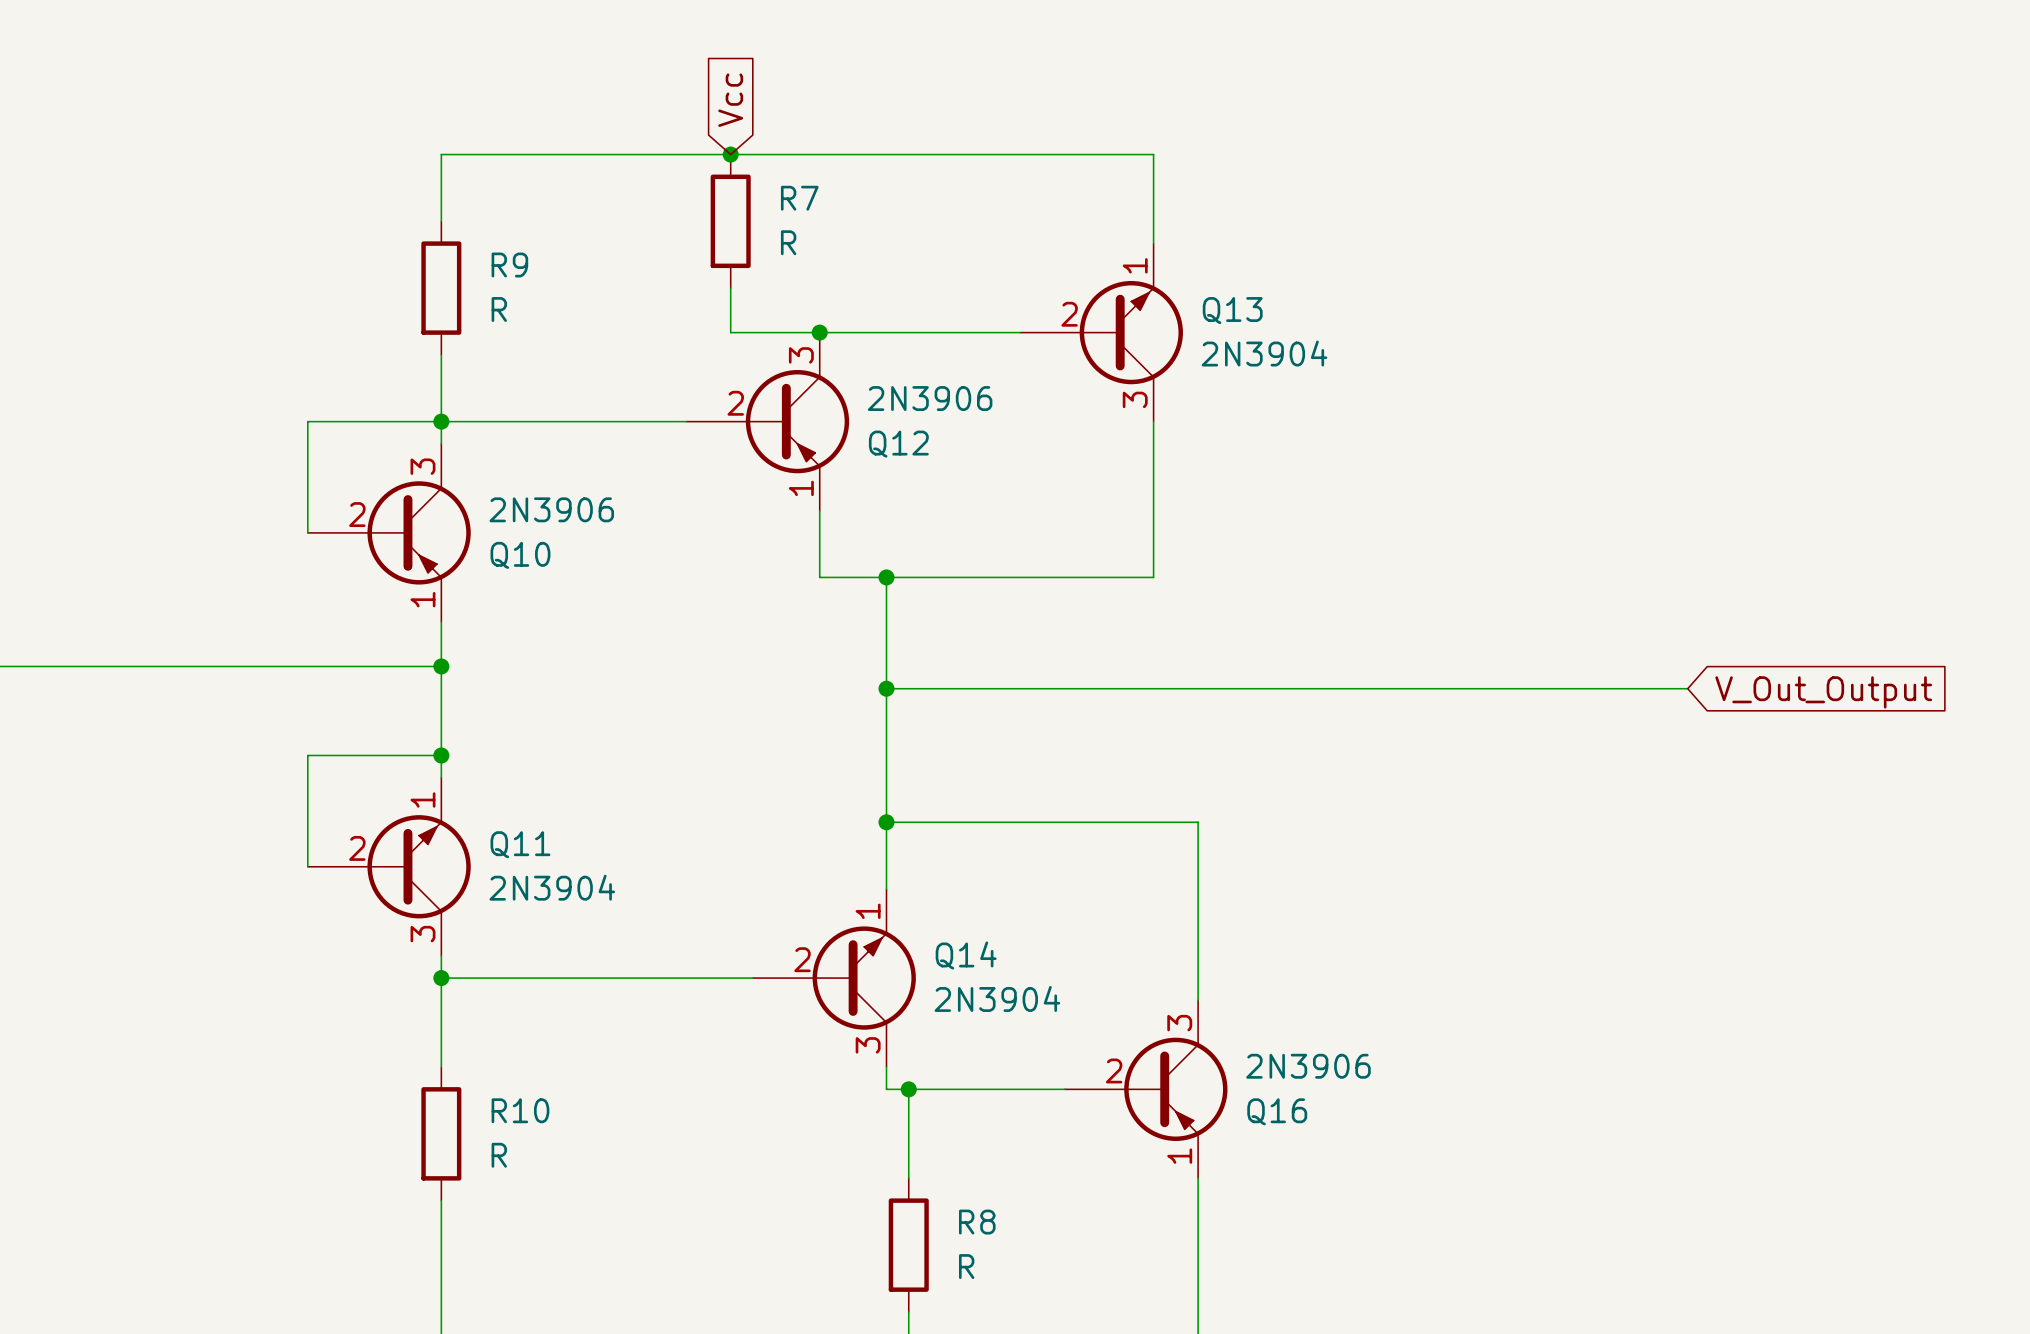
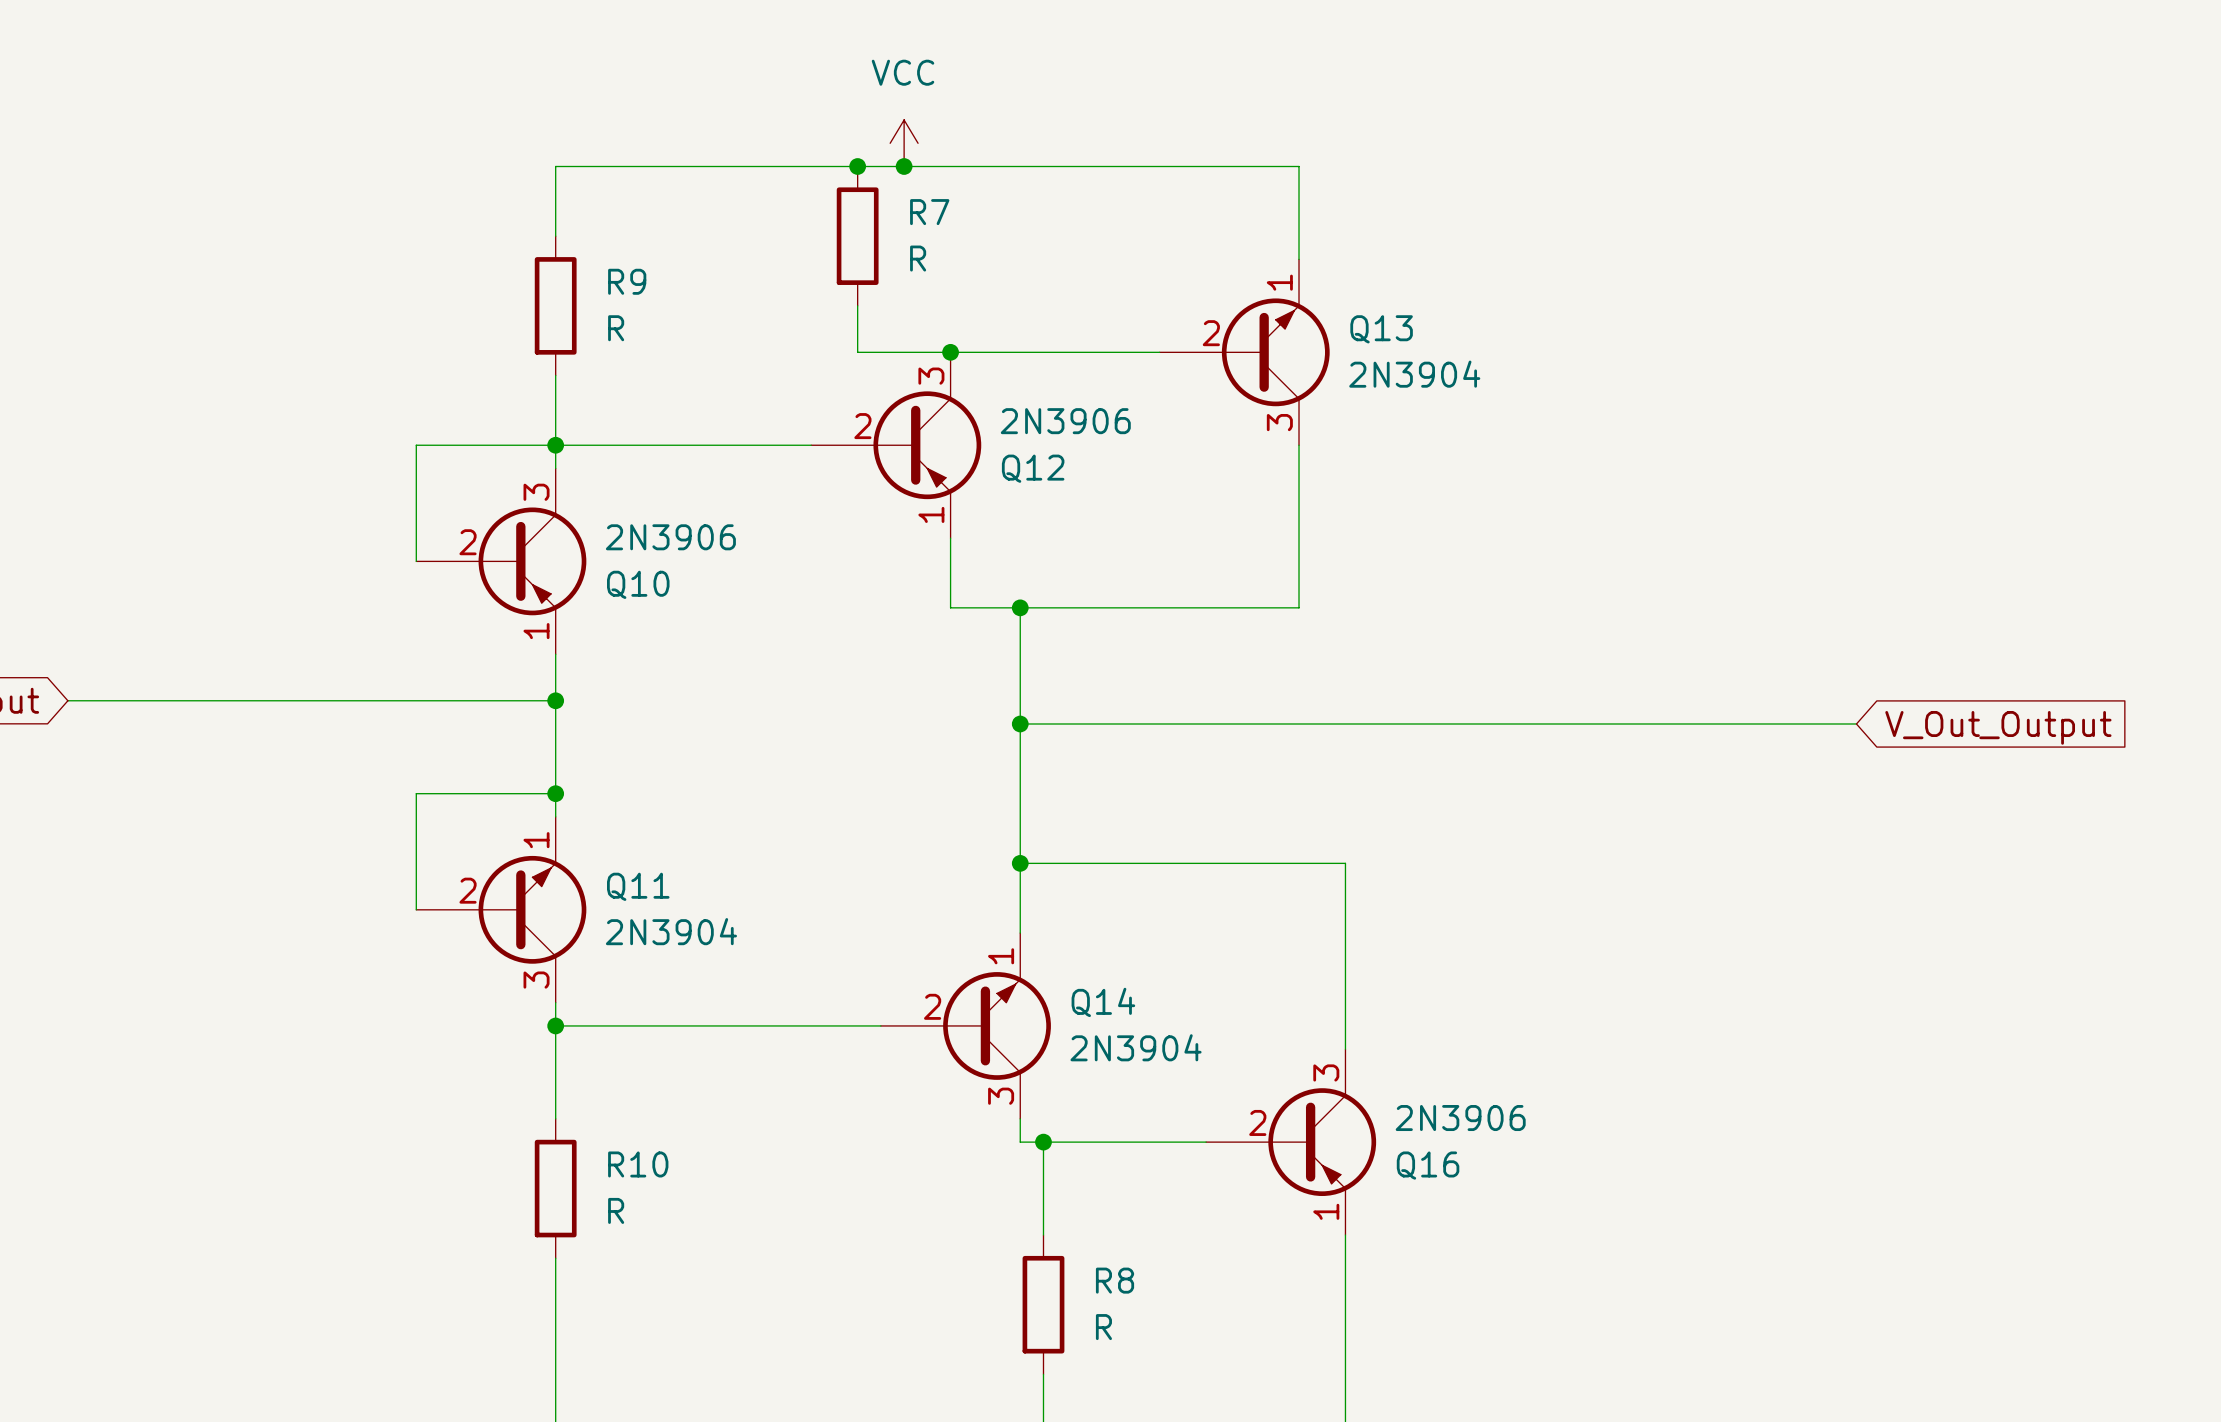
global label: Vcc (730, 100) -> none
power symbol: none -> VCC (904, 143)
junction: none -> (904, 166)

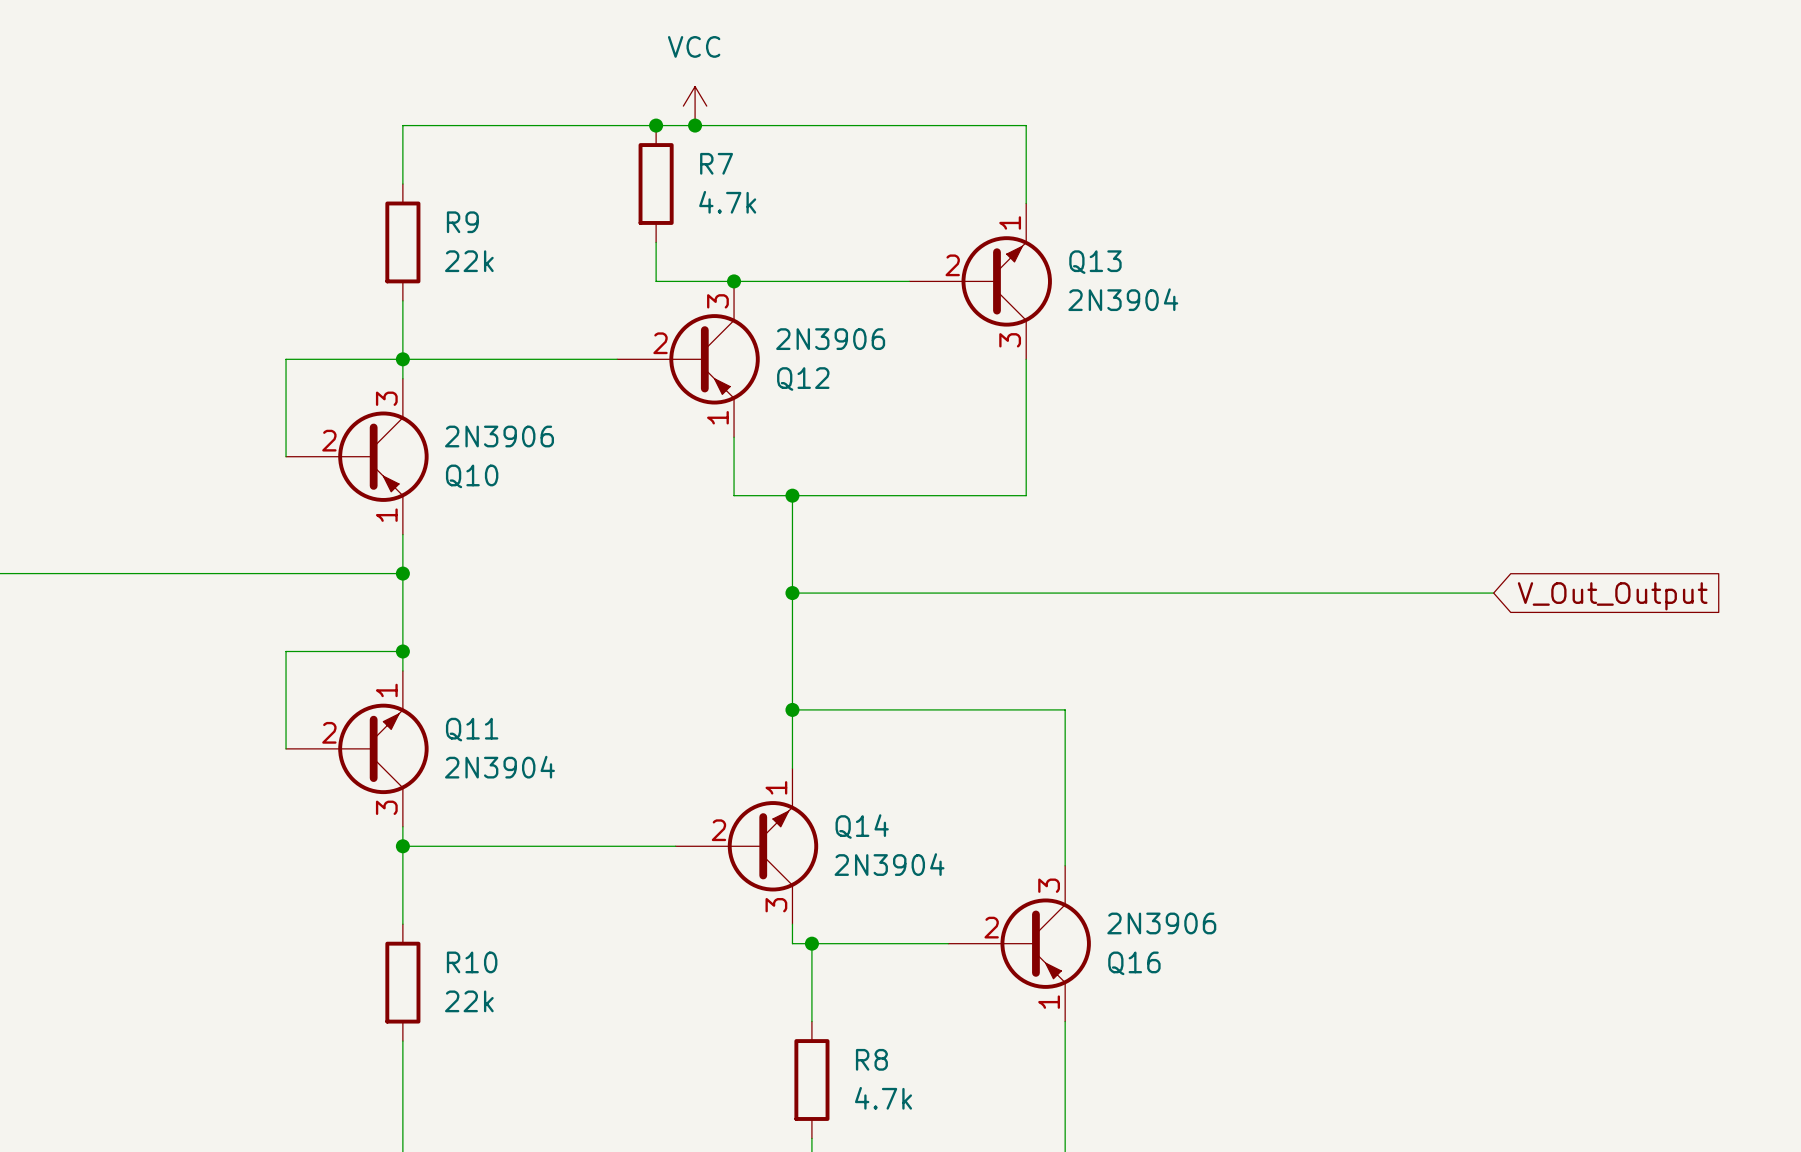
R7 value: R (918, 258) -> 4.7k (727, 202)
R9 value: R (616, 328) -> 22k (469, 261)
R10 value: R (616, 1210) -> 22k (469, 1001)
R8 value: R (1103, 1327) -> 4.7k (883, 1098)

